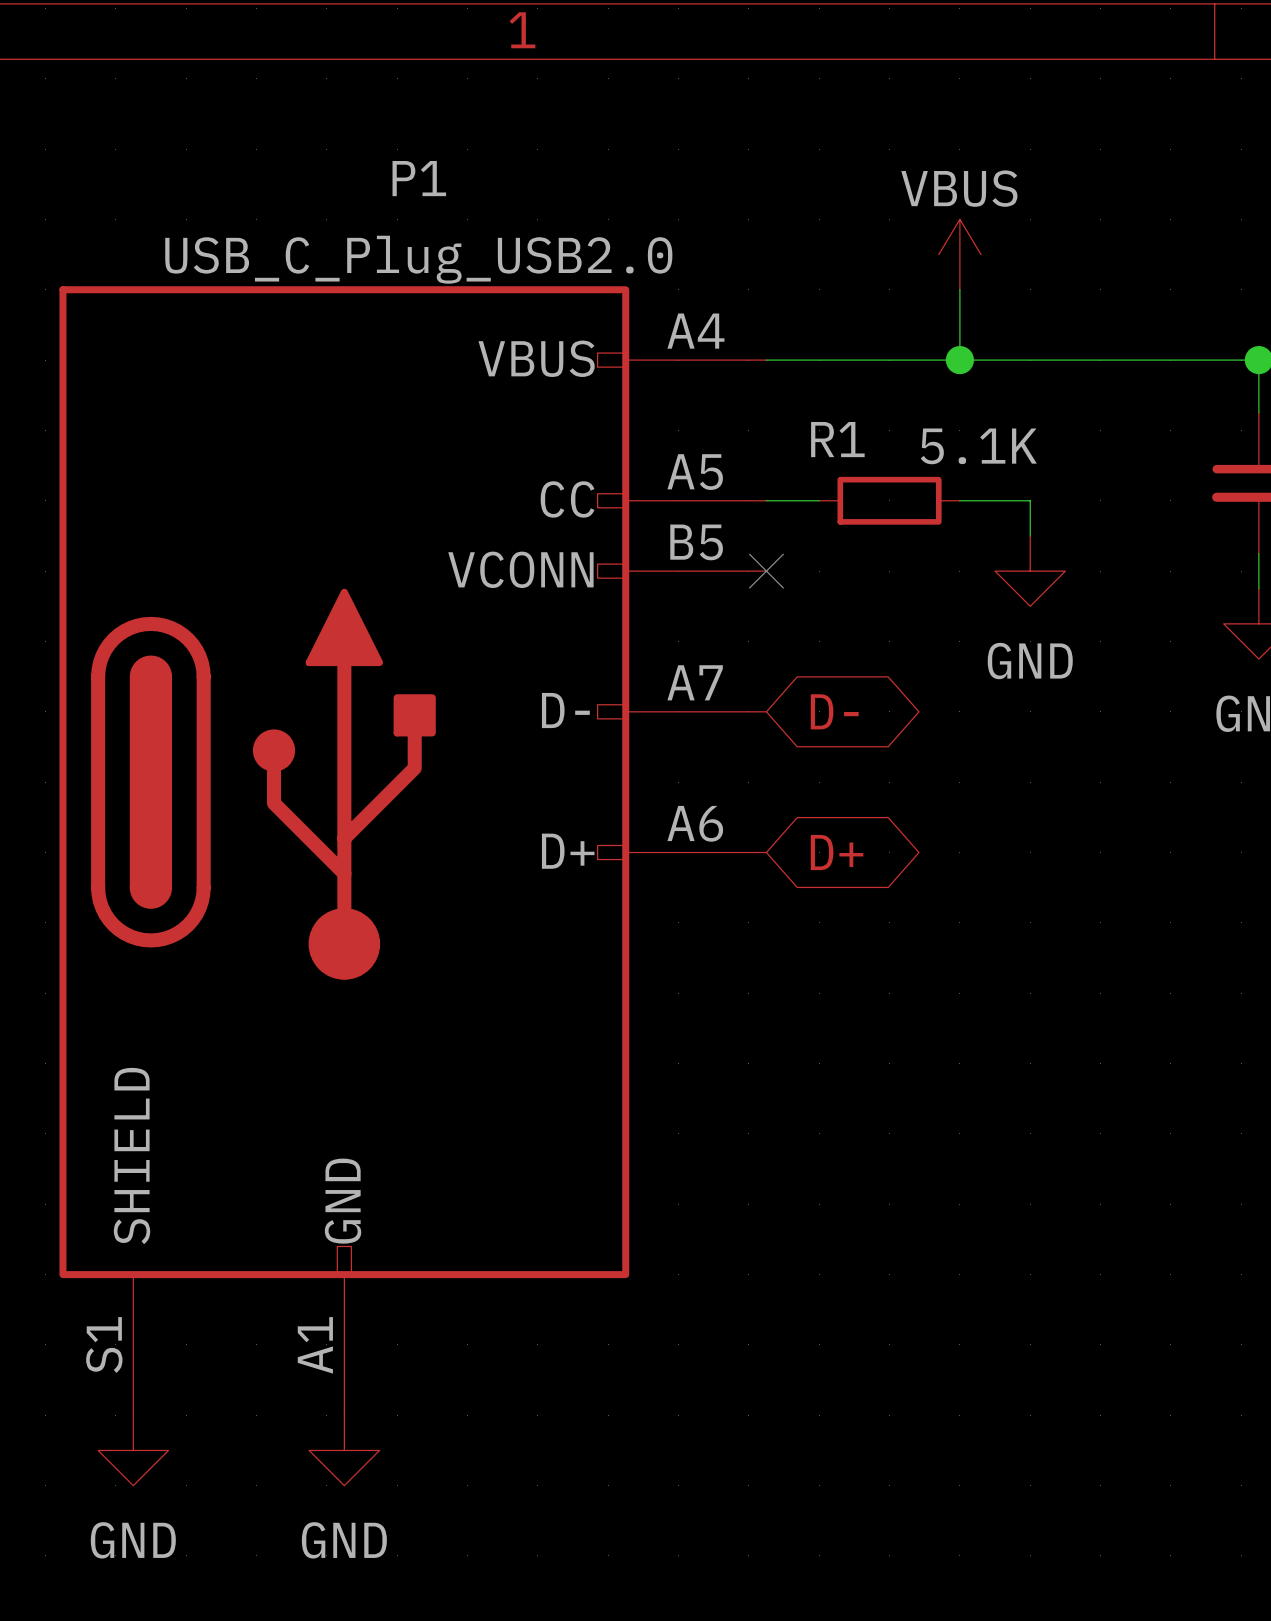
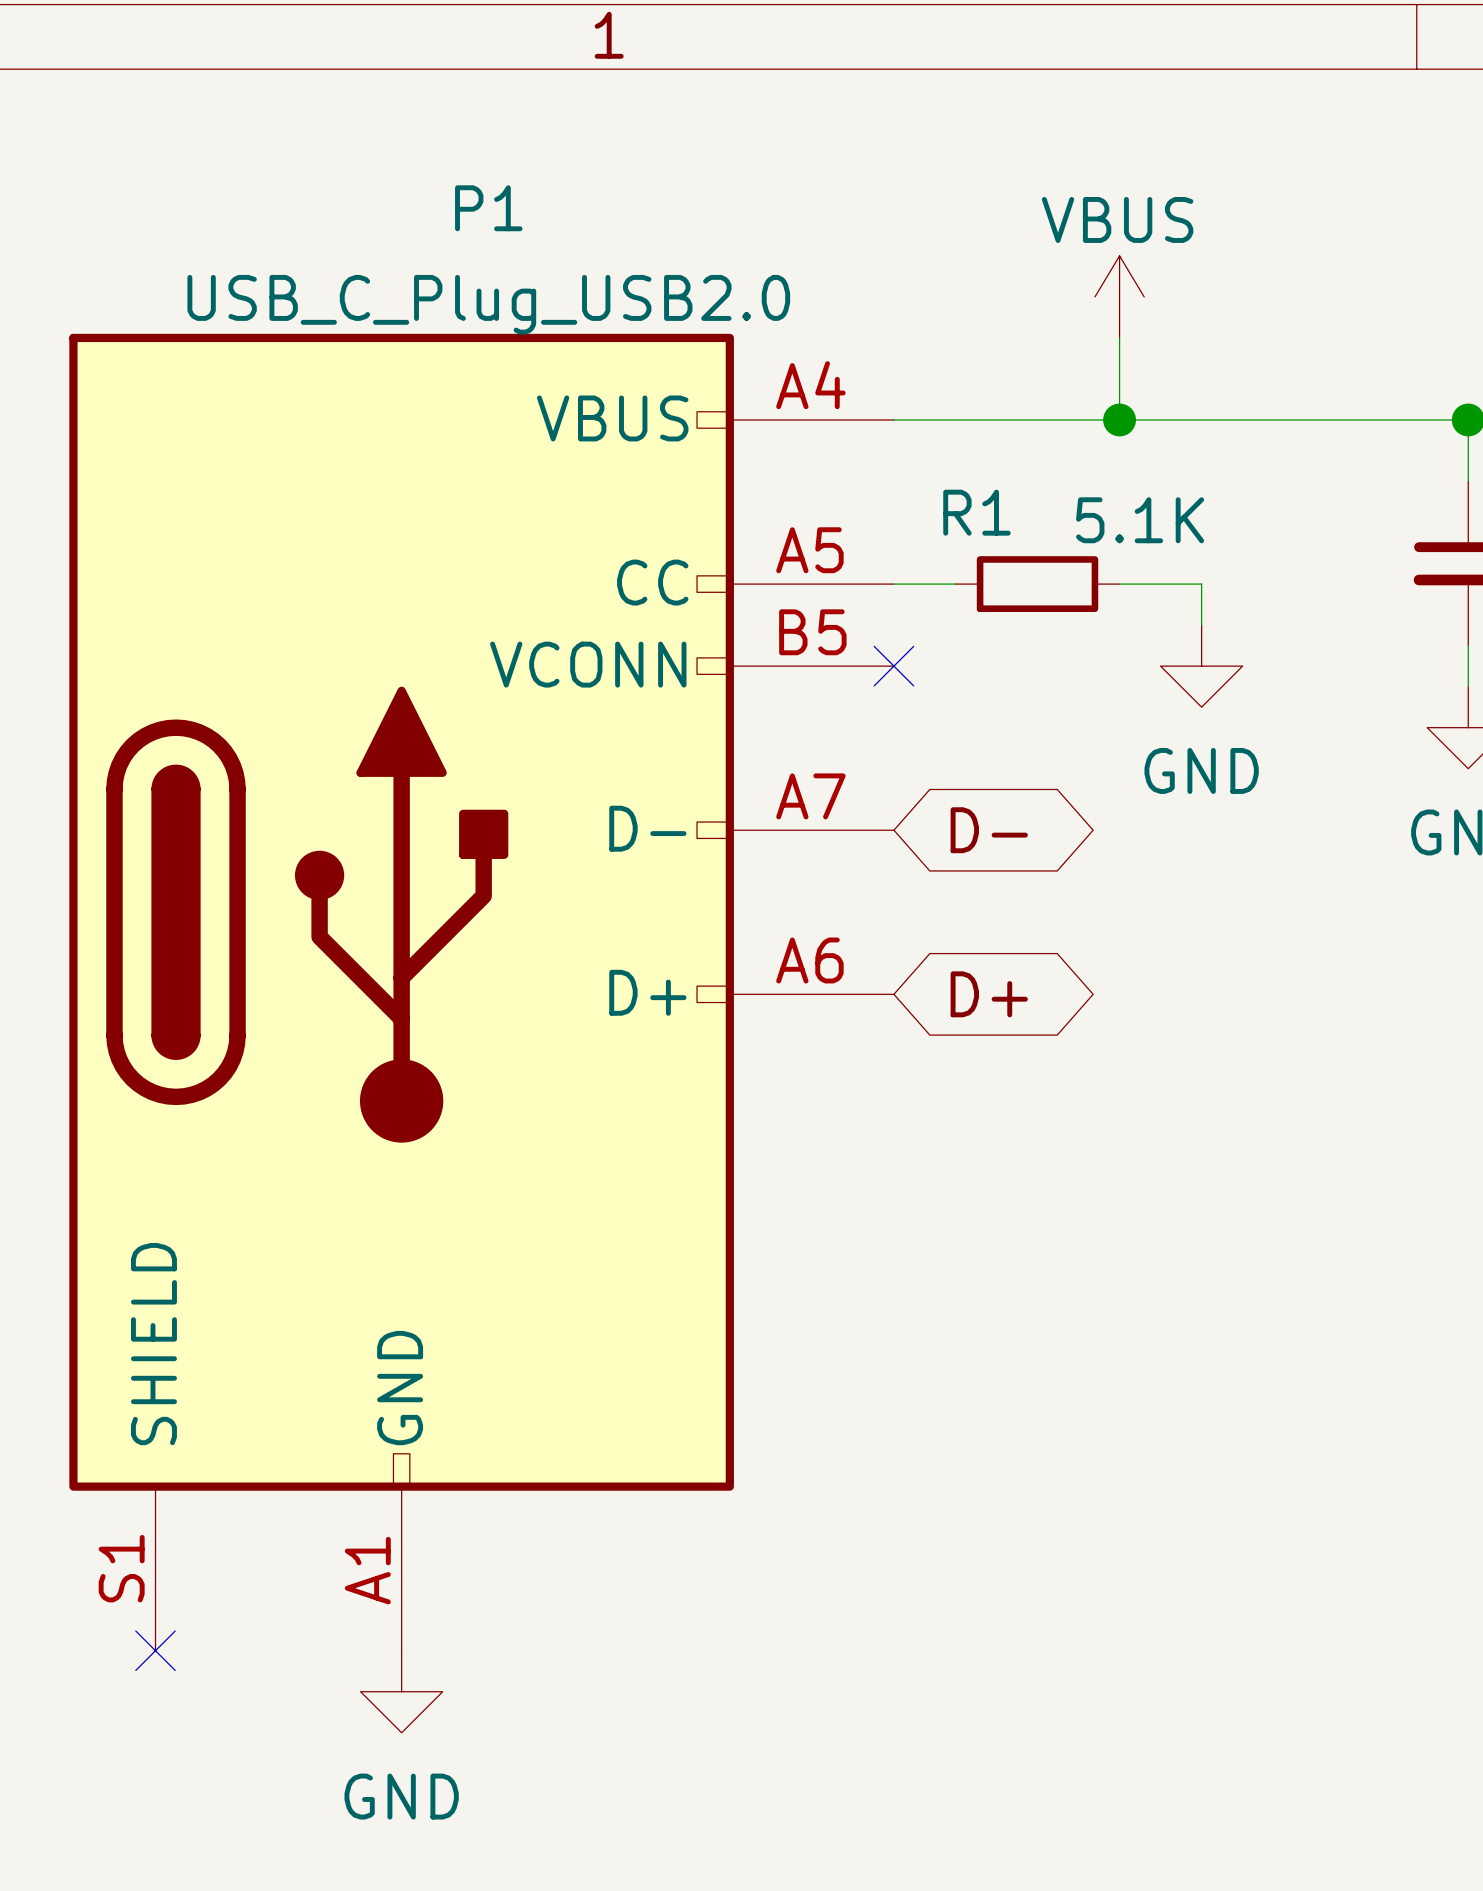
no-connect mark: none -> (155, 1650)
power symbol: GND (133, 1450) -> none

